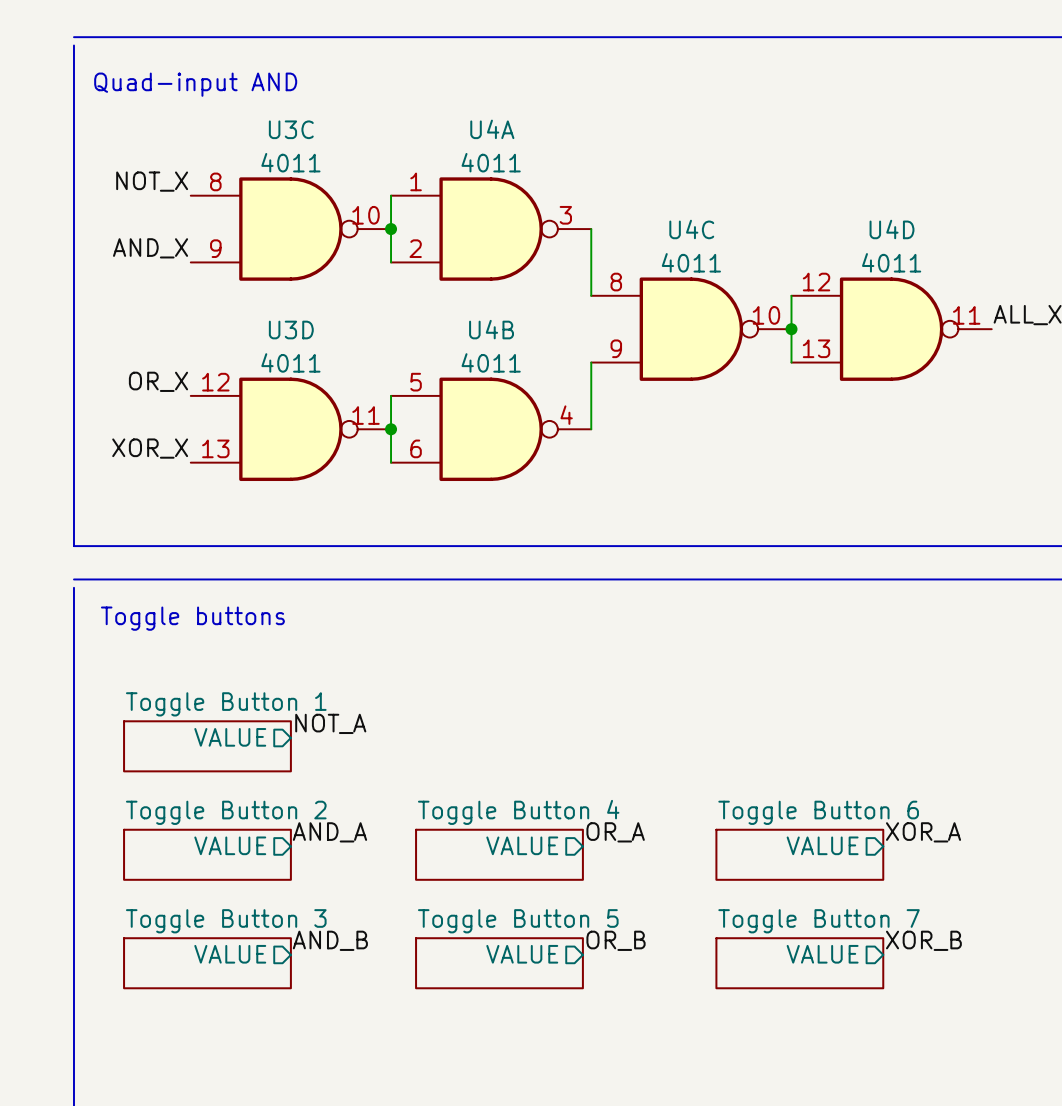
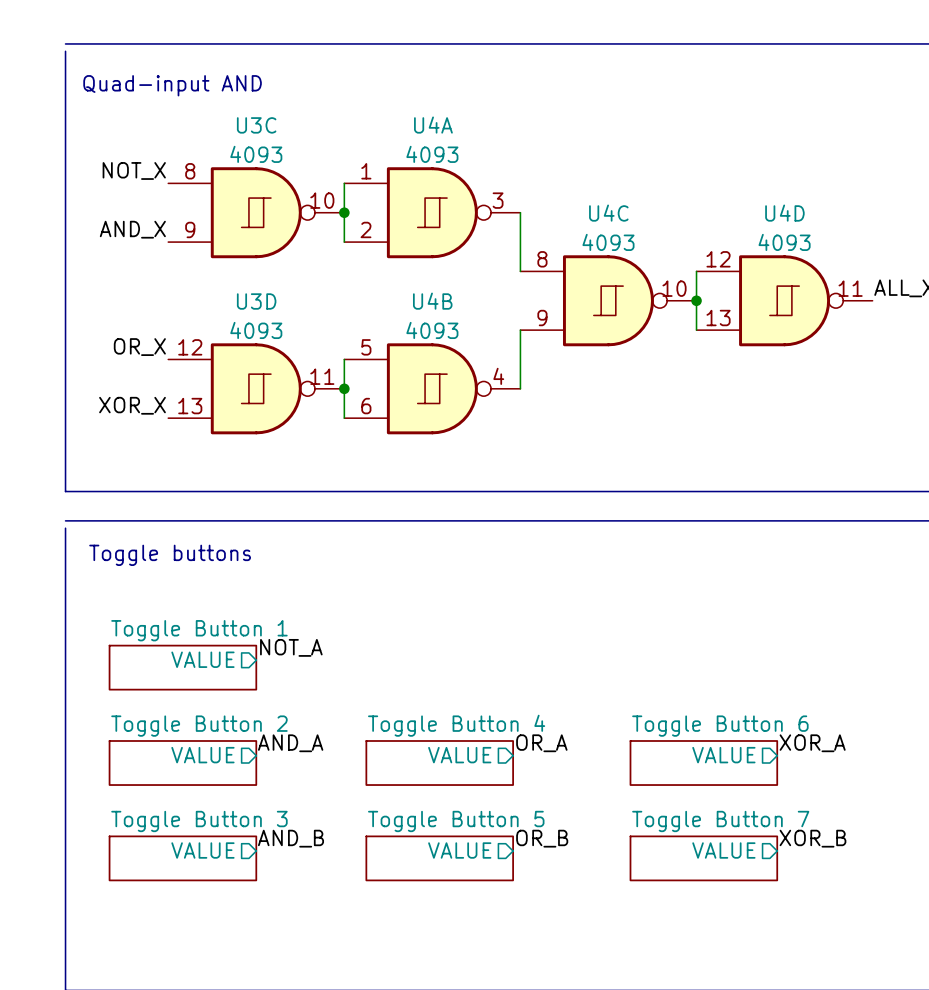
U3C value: 4011 (290, 162) -> 4093 (256, 154)
U4A value: 4011 (491, 162) -> 4093 (432, 154)
U3C symbol: [190, 177, 392, 281] -> [168, 167, 345, 259]
U4A symbol: [391, 177, 592, 281] -> [344, 167, 521, 259]
U4C value: 4011 (691, 262) -> 4093 (608, 242)
U4D value: 4011 (891, 262) -> 4093 (784, 242)
U4C symbol: [591, 277, 792, 381] -> [520, 255, 697, 347]
U4D symbol: [791, 277, 992, 381] -> [696, 255, 873, 347]
U3D value: 4011 (290, 362) -> 4093 (256, 330)
U4B value: 4011 (491, 362) -> 4093 (432, 330)
U3D symbol: [190, 377, 392, 482] -> [168, 343, 345, 435]
U4B symbol: [391, 377, 592, 482] -> [344, 343, 521, 435]

